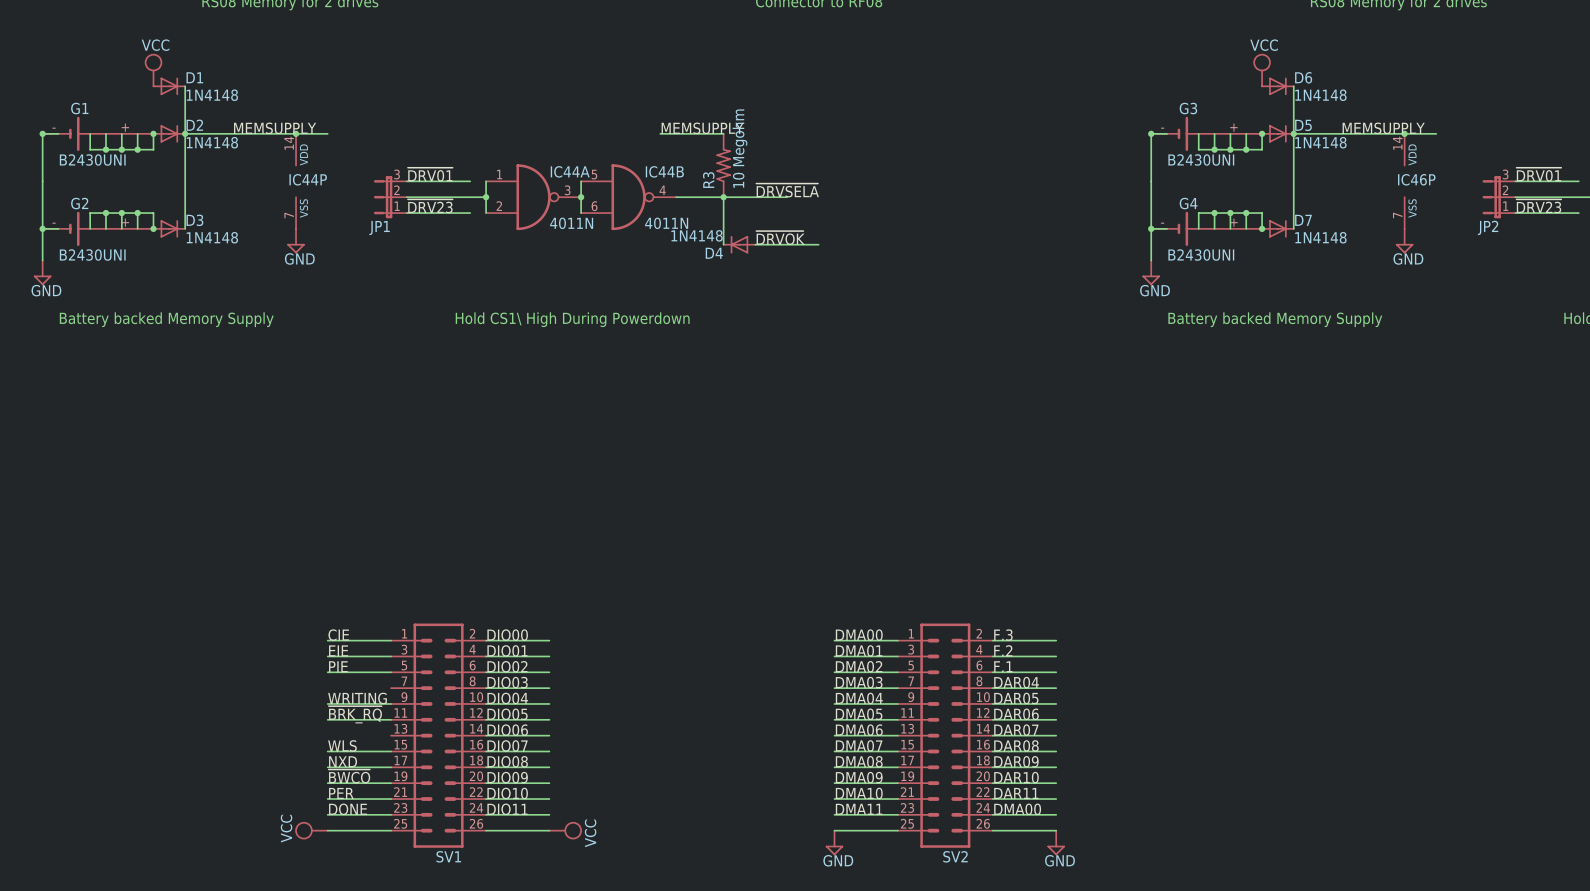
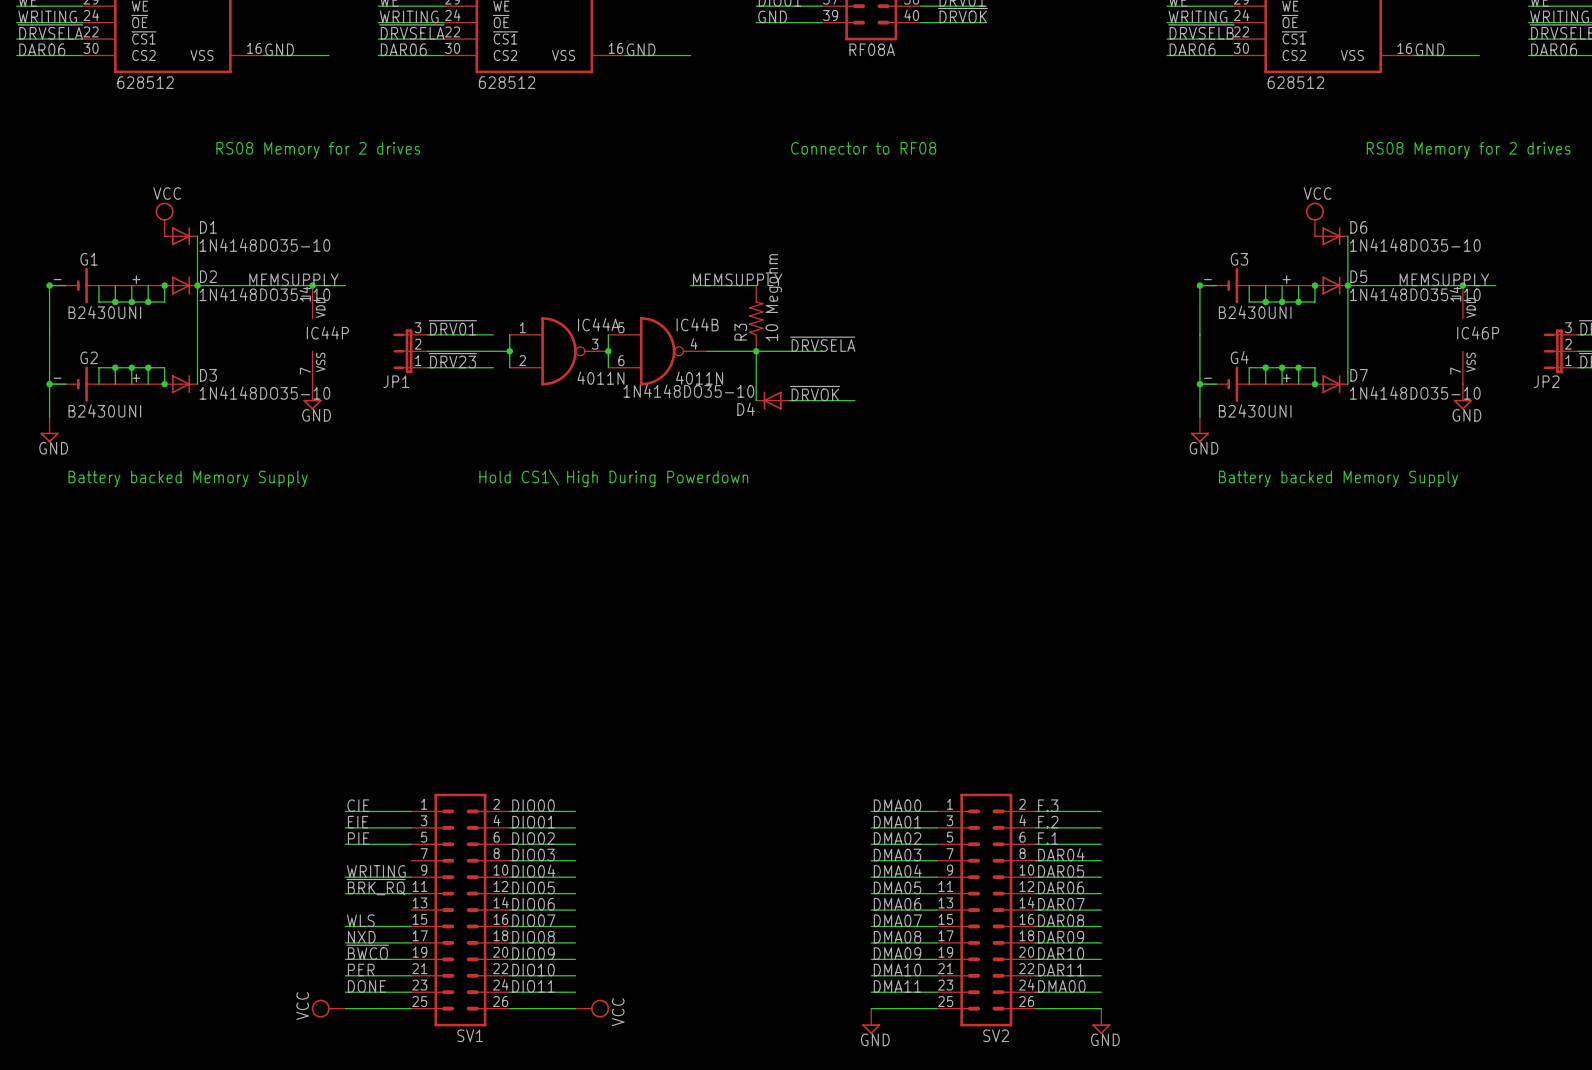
D1 value: 1N4148 (212, 95) -> 1N4148DO35-10 (264, 245)
D6 value: 1N4148 (1320, 95) -> 1N4148DO35-10 (1415, 245)
D2 value: 1N4148 (212, 142) -> 1N4148DO35-10 (264, 294)
D5 value: 1N4148 (1320, 142) -> 1N4148DO35-10 (1415, 294)
D4 value: 1N4148 (697, 235) -> 1N4148DO35-10 (688, 391)
D3 value: 1N4148 (212, 237) -> 1N4148DO35-10 (264, 393)
D7 value: 1N4148 (1320, 237) -> 1N4148DO35-10 (1415, 393)

